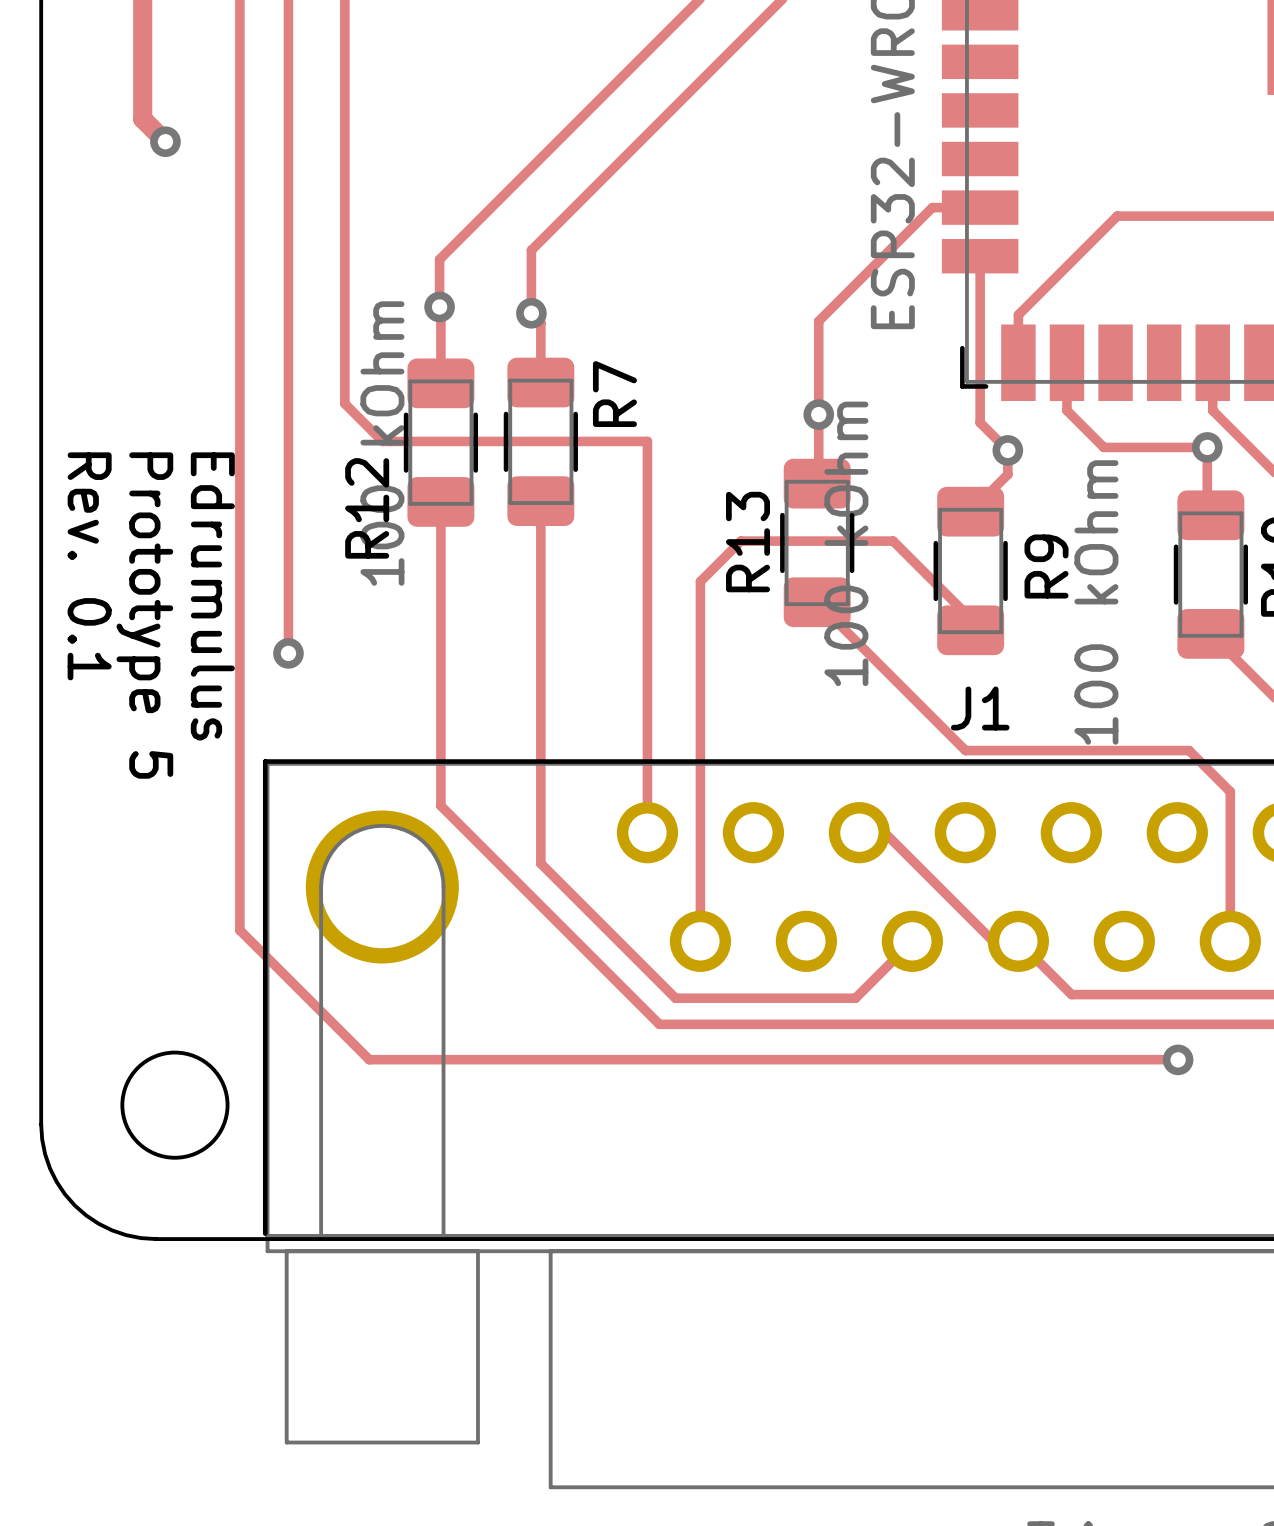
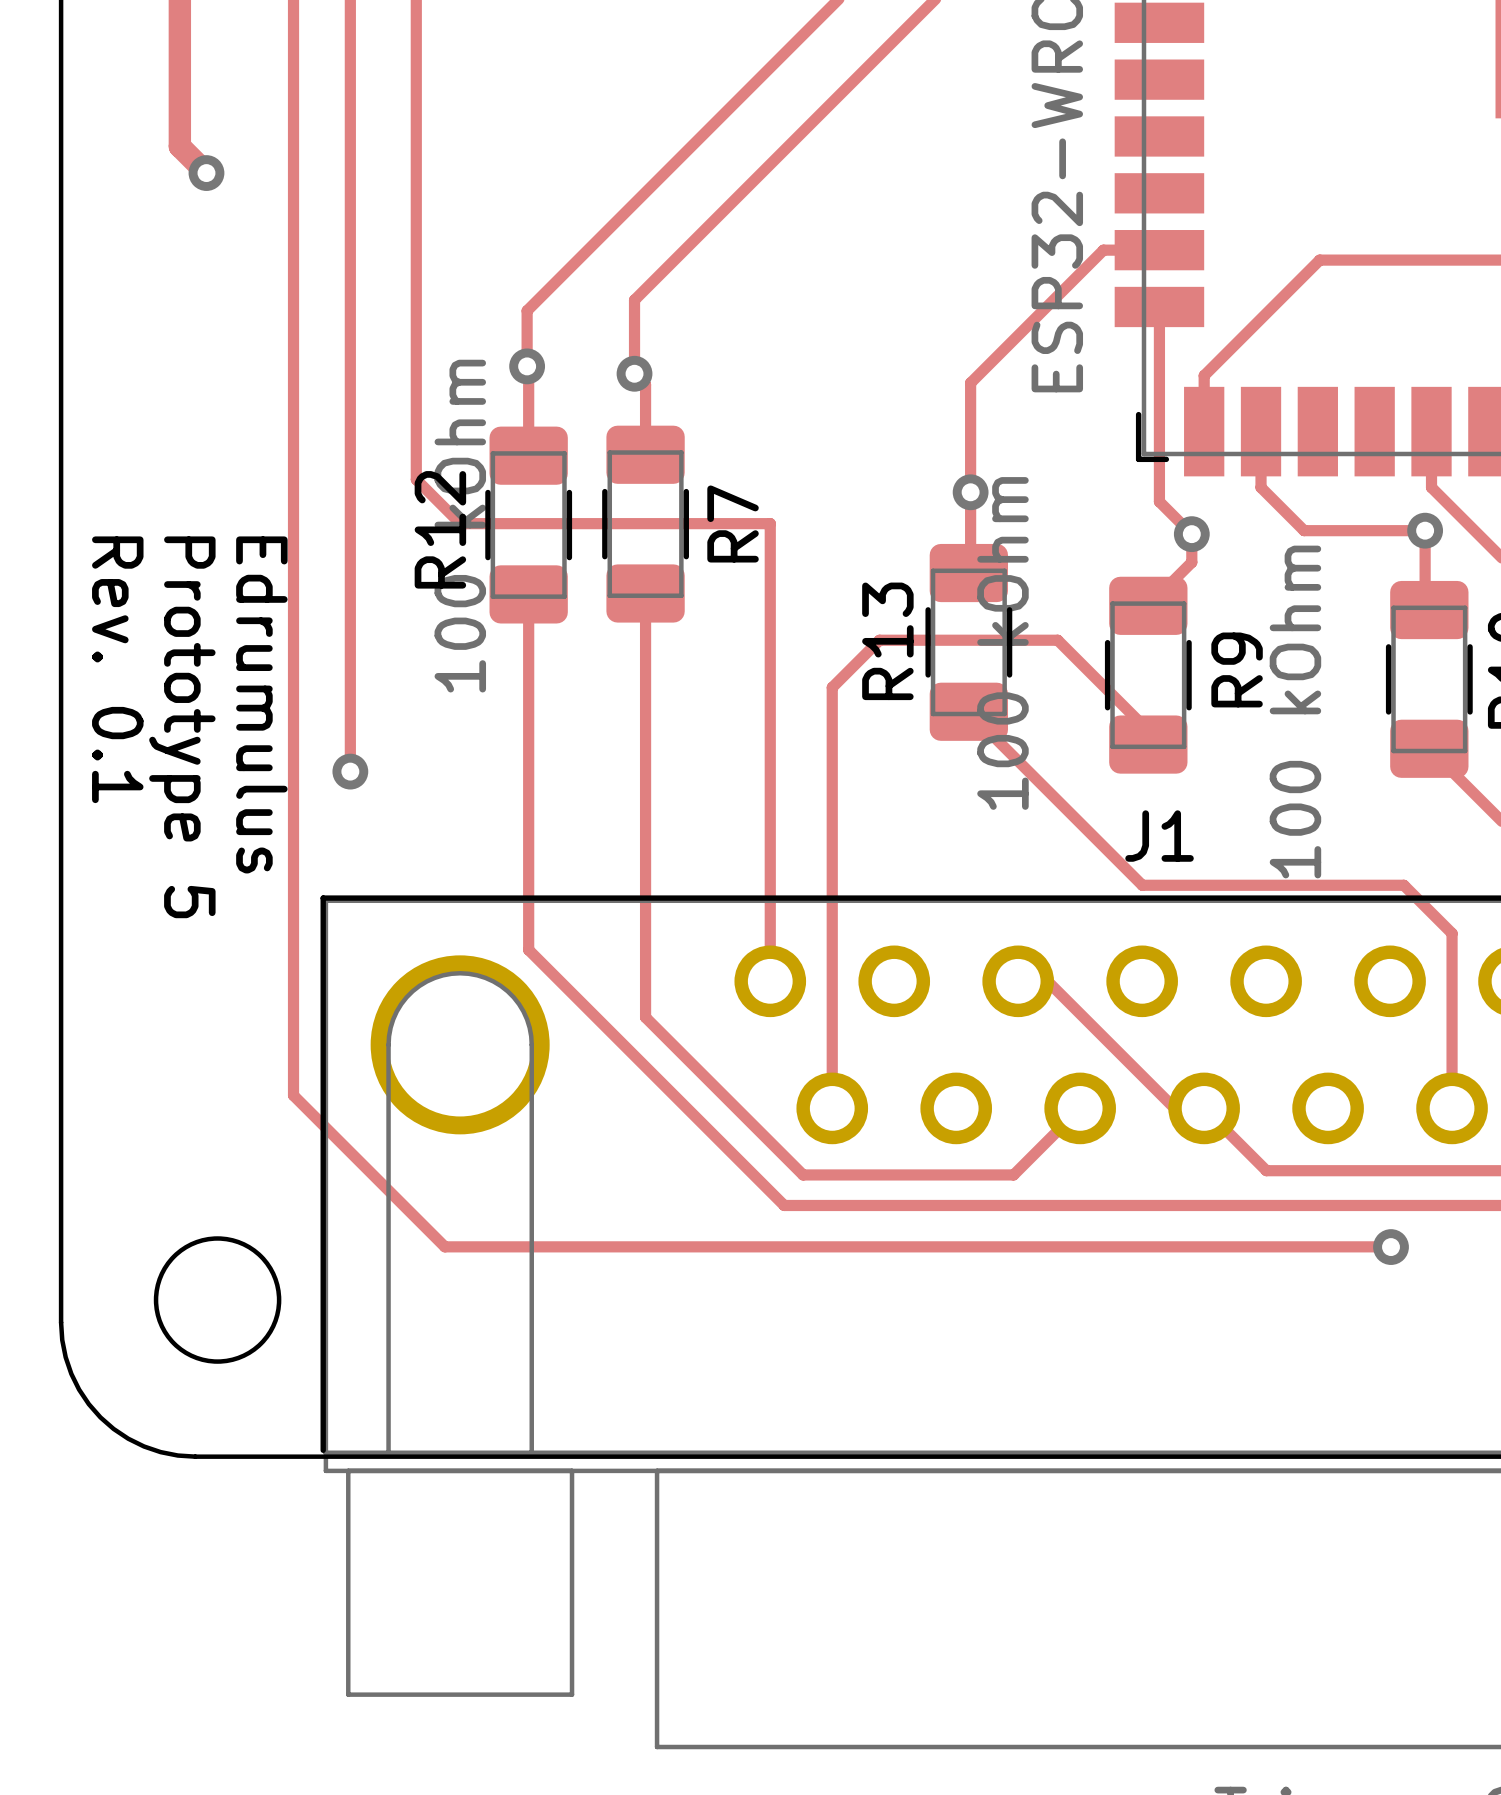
R7 name position: R7 (614, 394) -> R7 (733, 524)
R12 name position: R12 (367, 508) -> R12 (440, 529)

